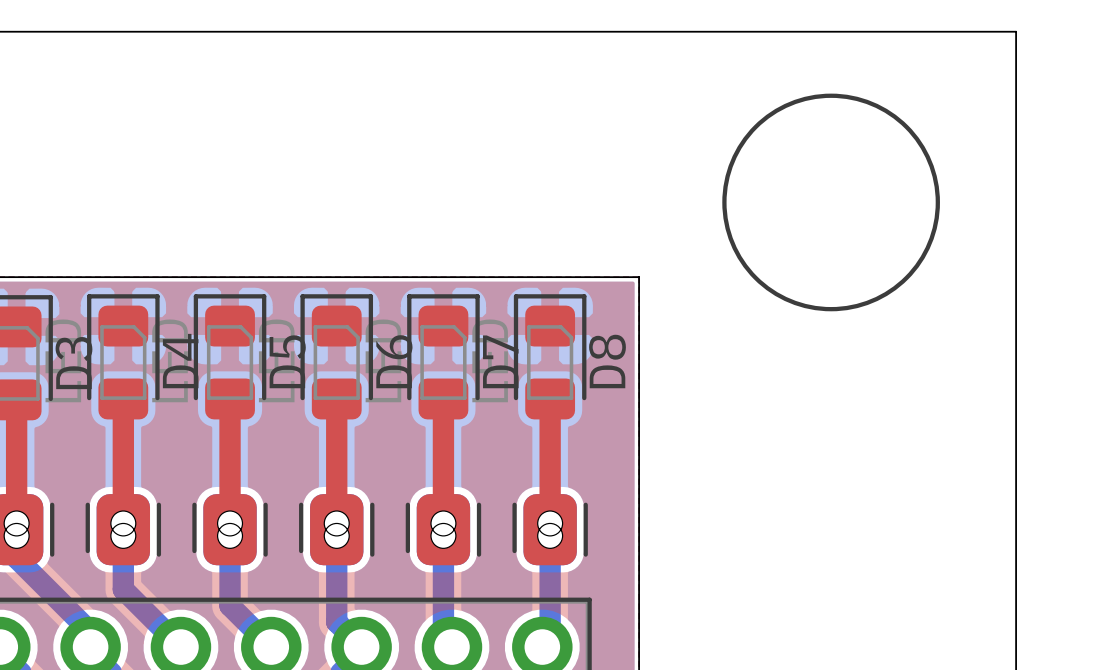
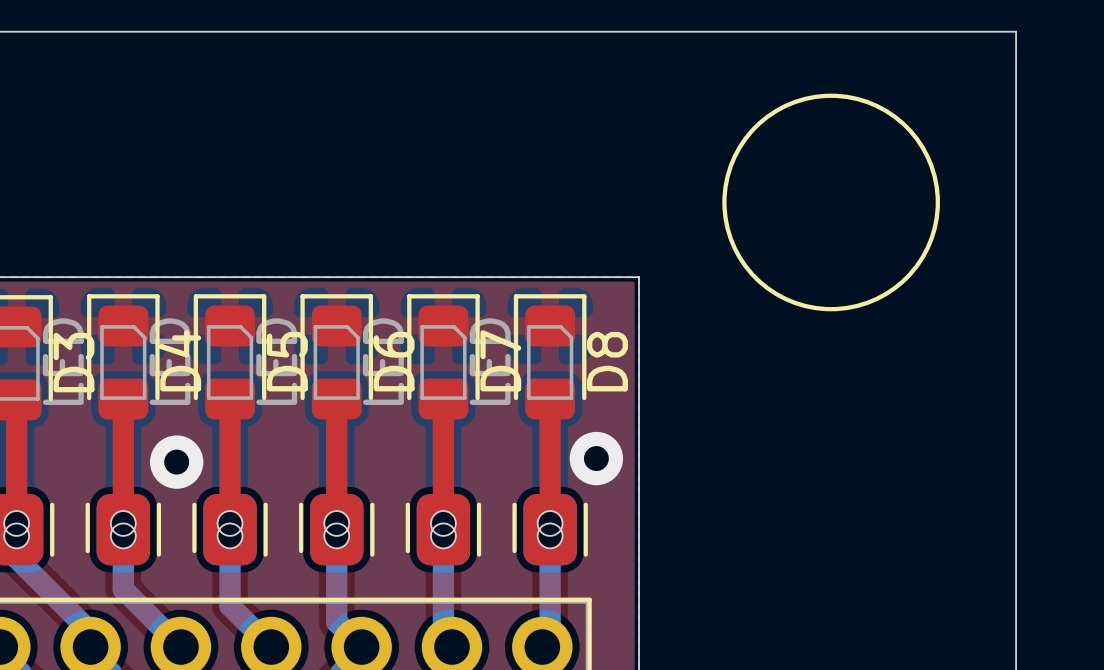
via: none -> (596, 458)
via: none -> (176, 462)

